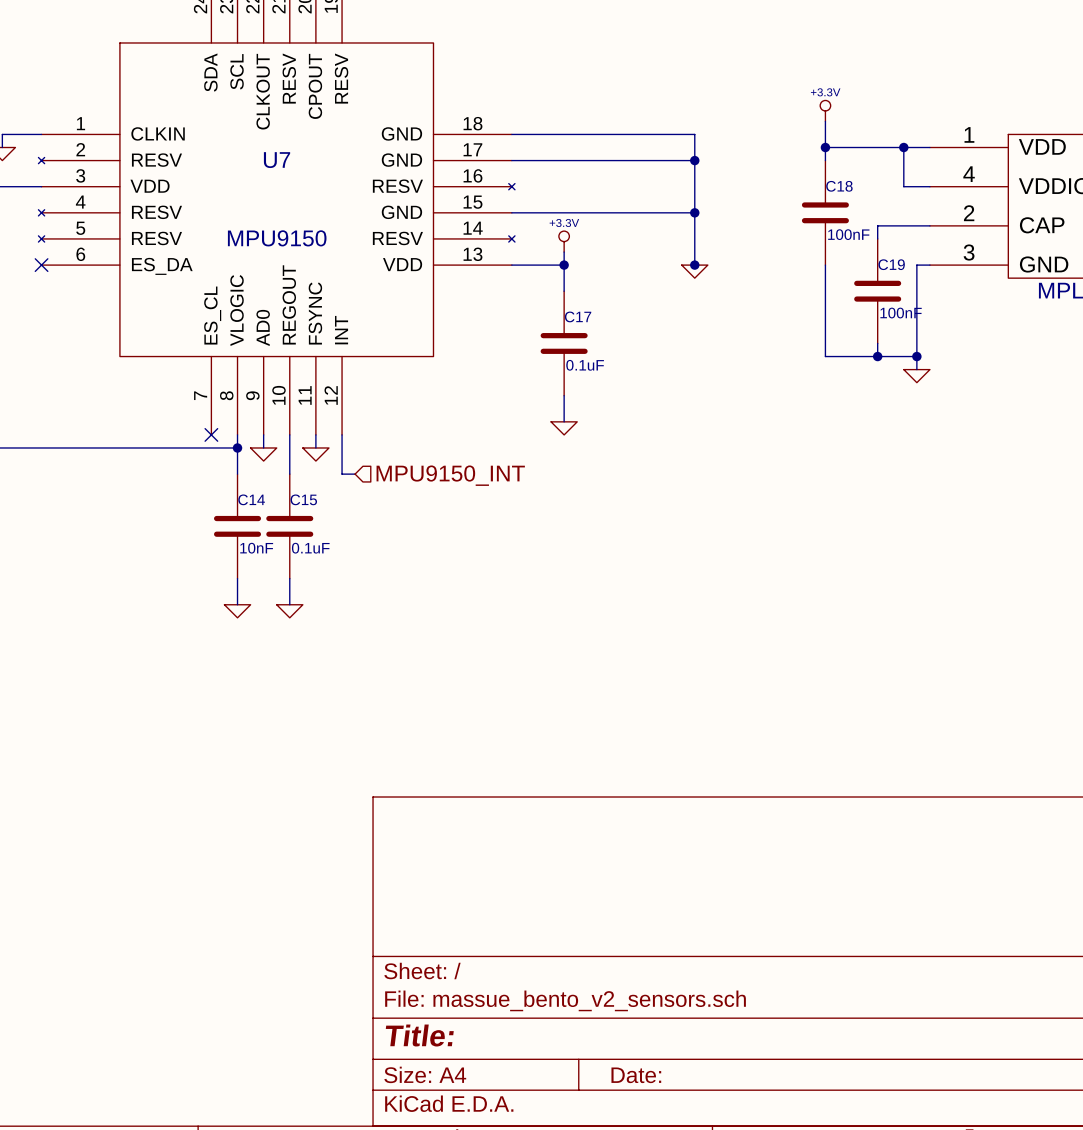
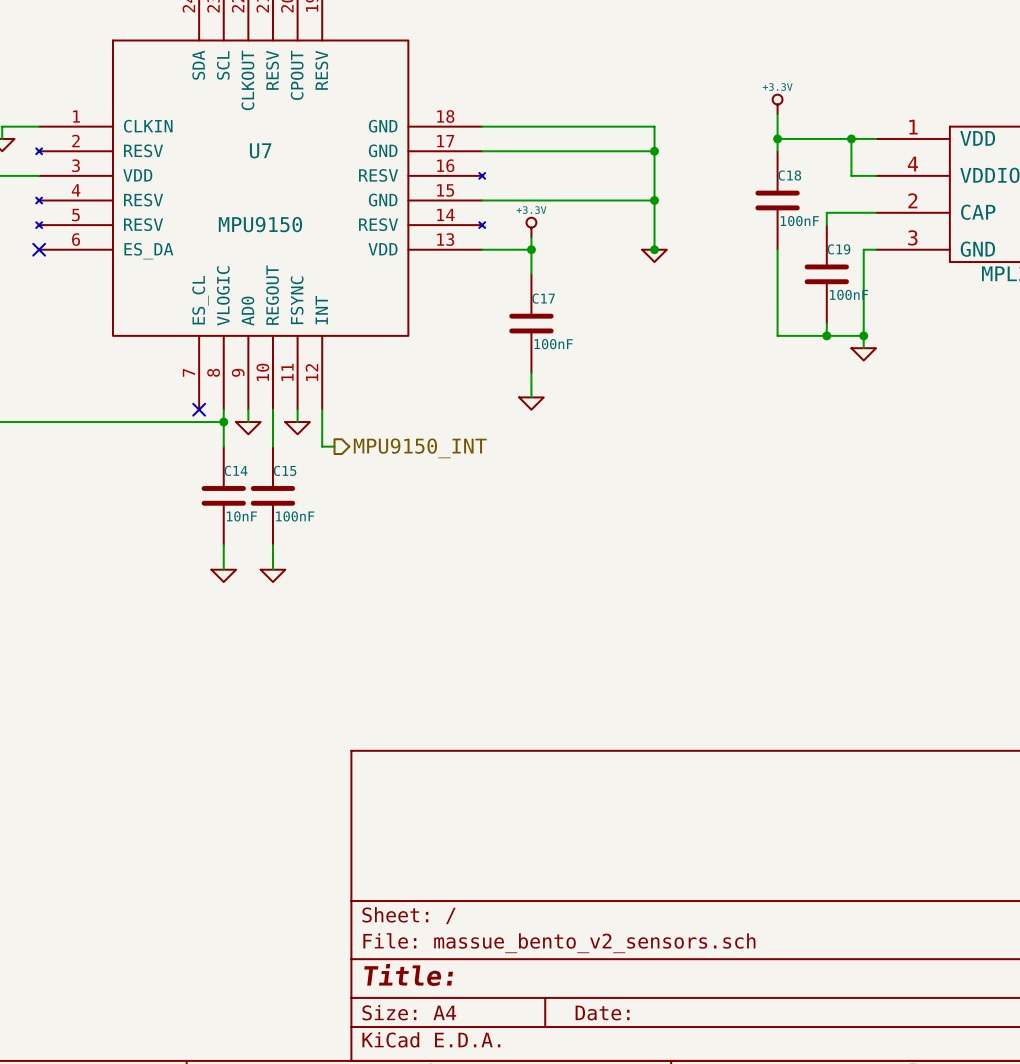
C17 value: 0.1uF (585, 365) -> 100nF (553, 344)
hierarchical label shape: input (450, 475) -> output (420, 448)
C15 value: 0.1uF (310, 548) -> 100nF (295, 516)

